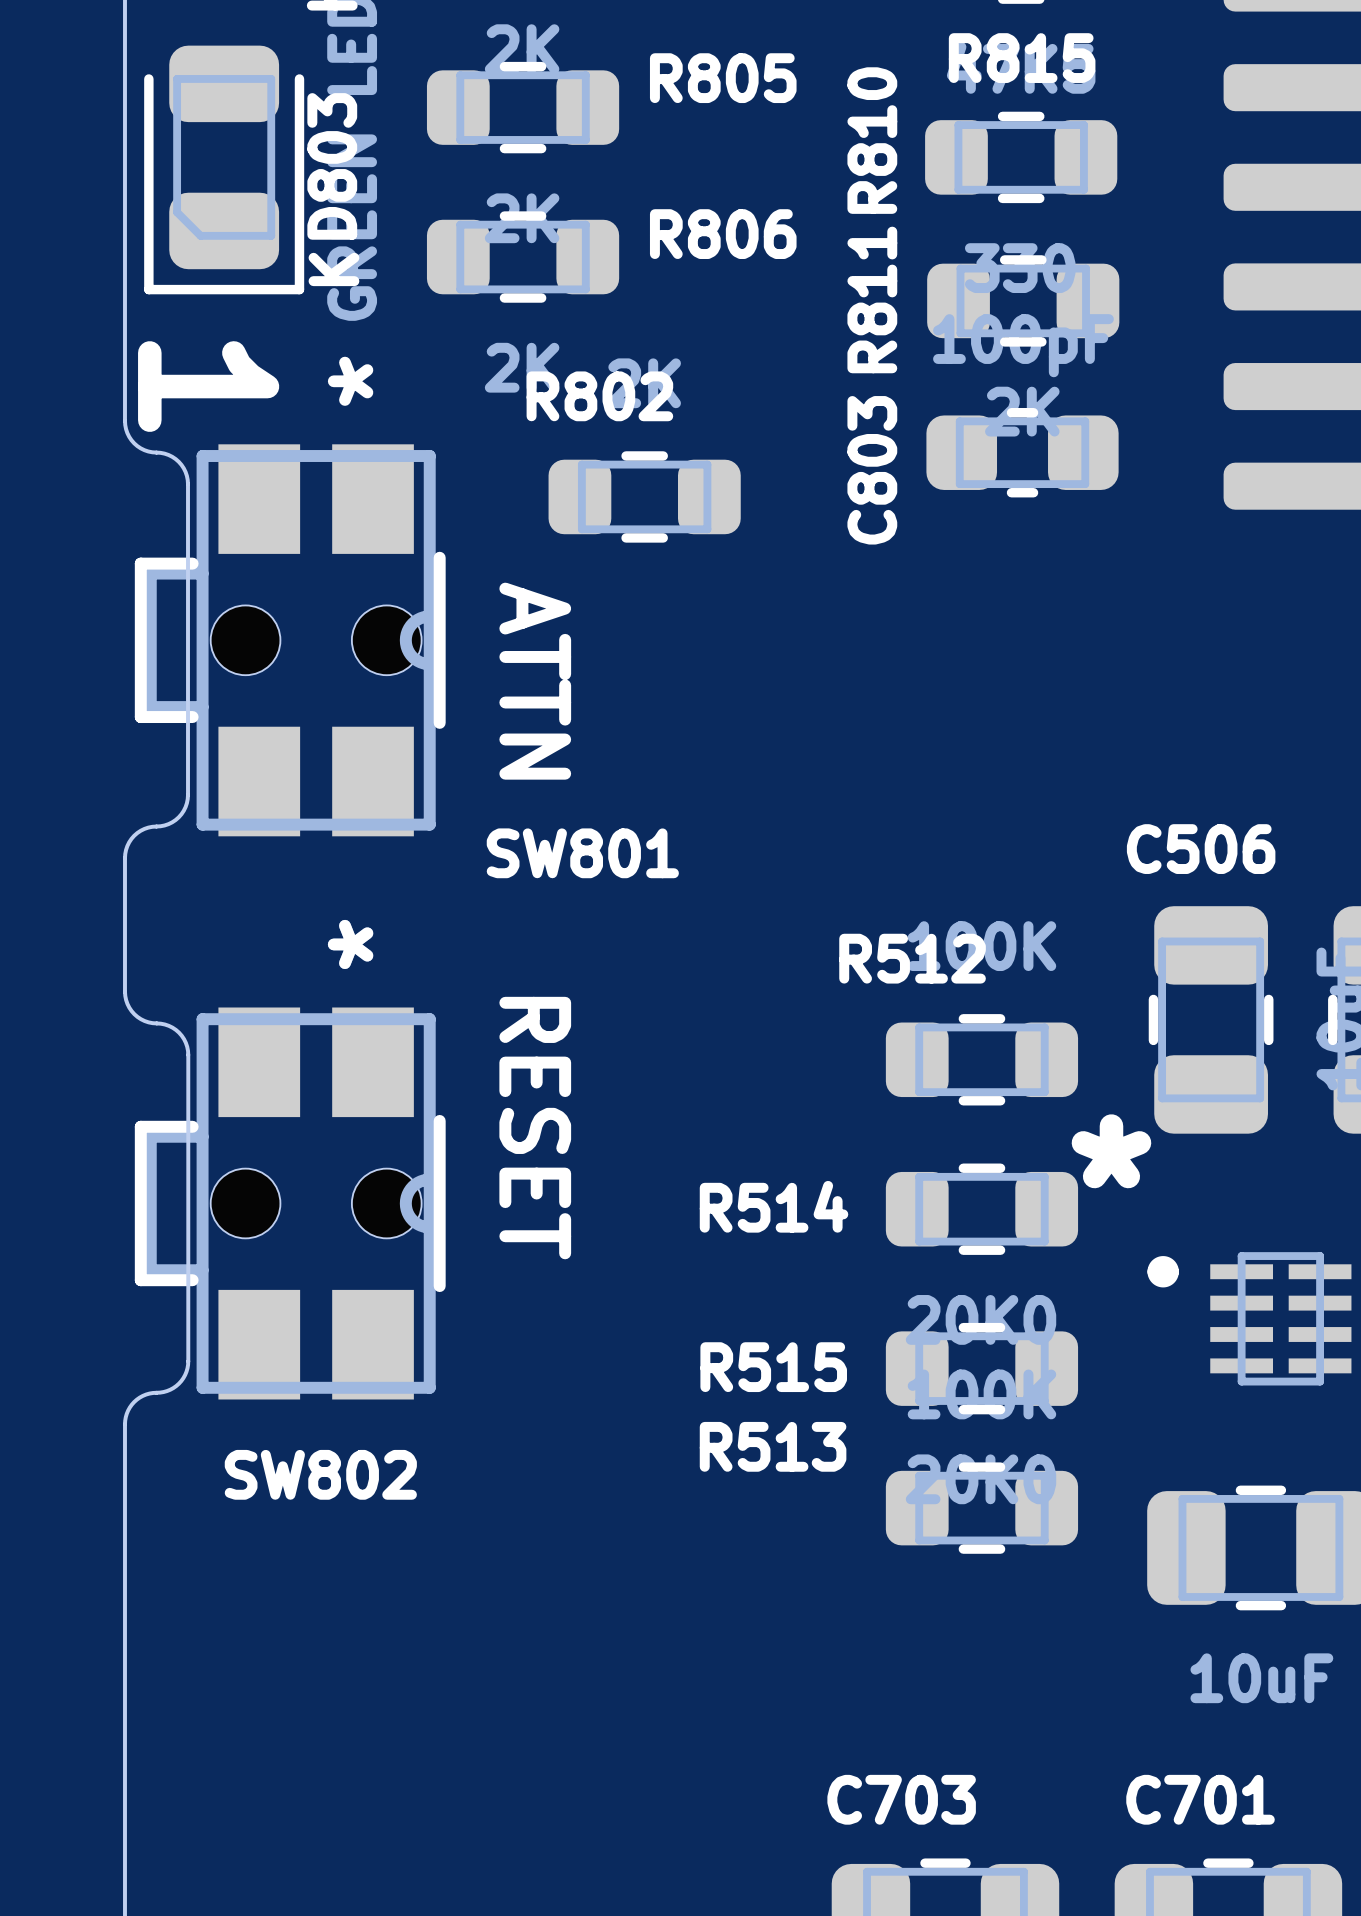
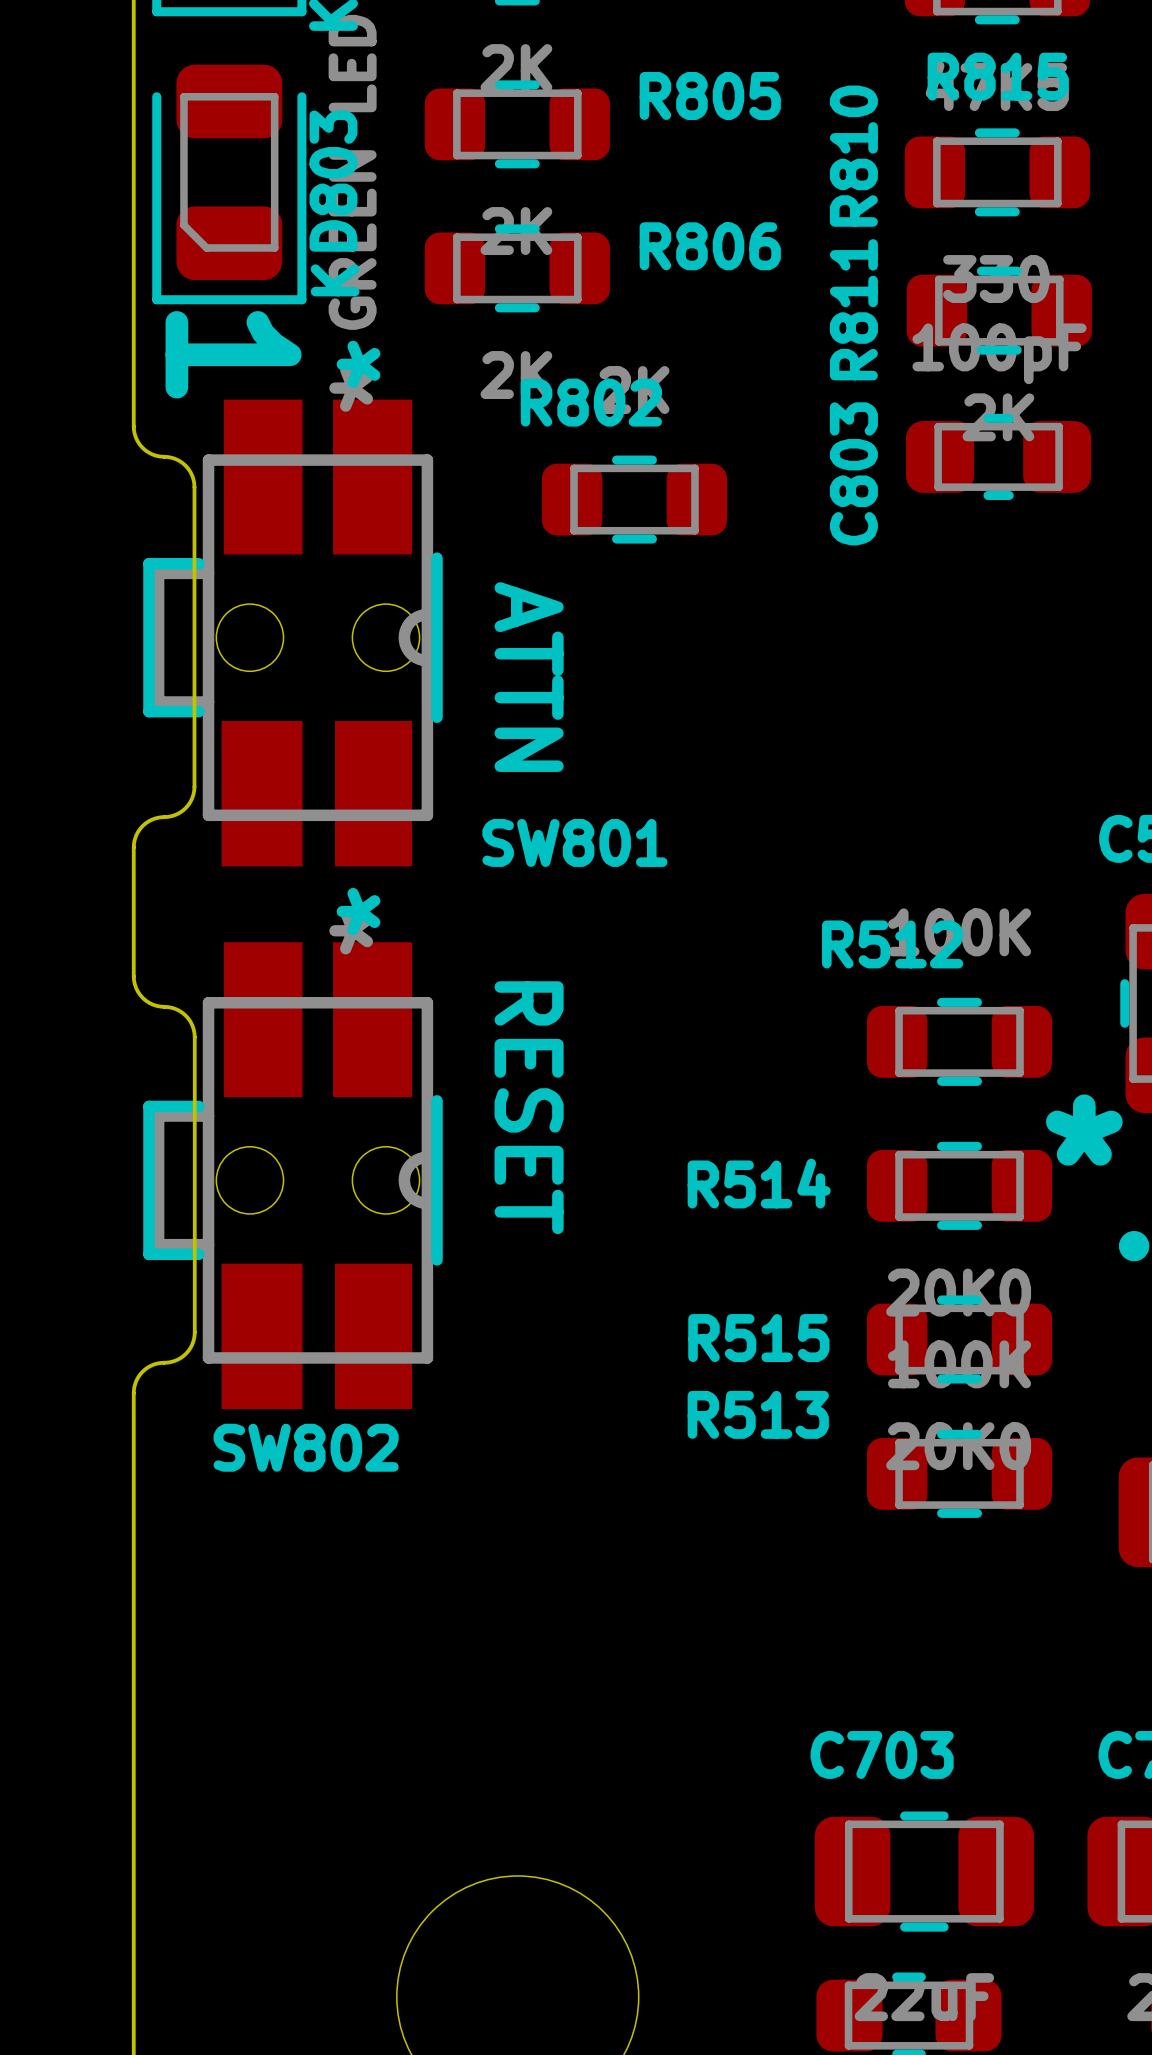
text position: 1 (208, 386) -> 1 (233, 354)
SW801 footprint: [134, 444, 446, 837] -> [143, 399, 443, 867]
SW802 footprint: [134, 1007, 446, 1400] -> [143, 942, 443, 1410]

